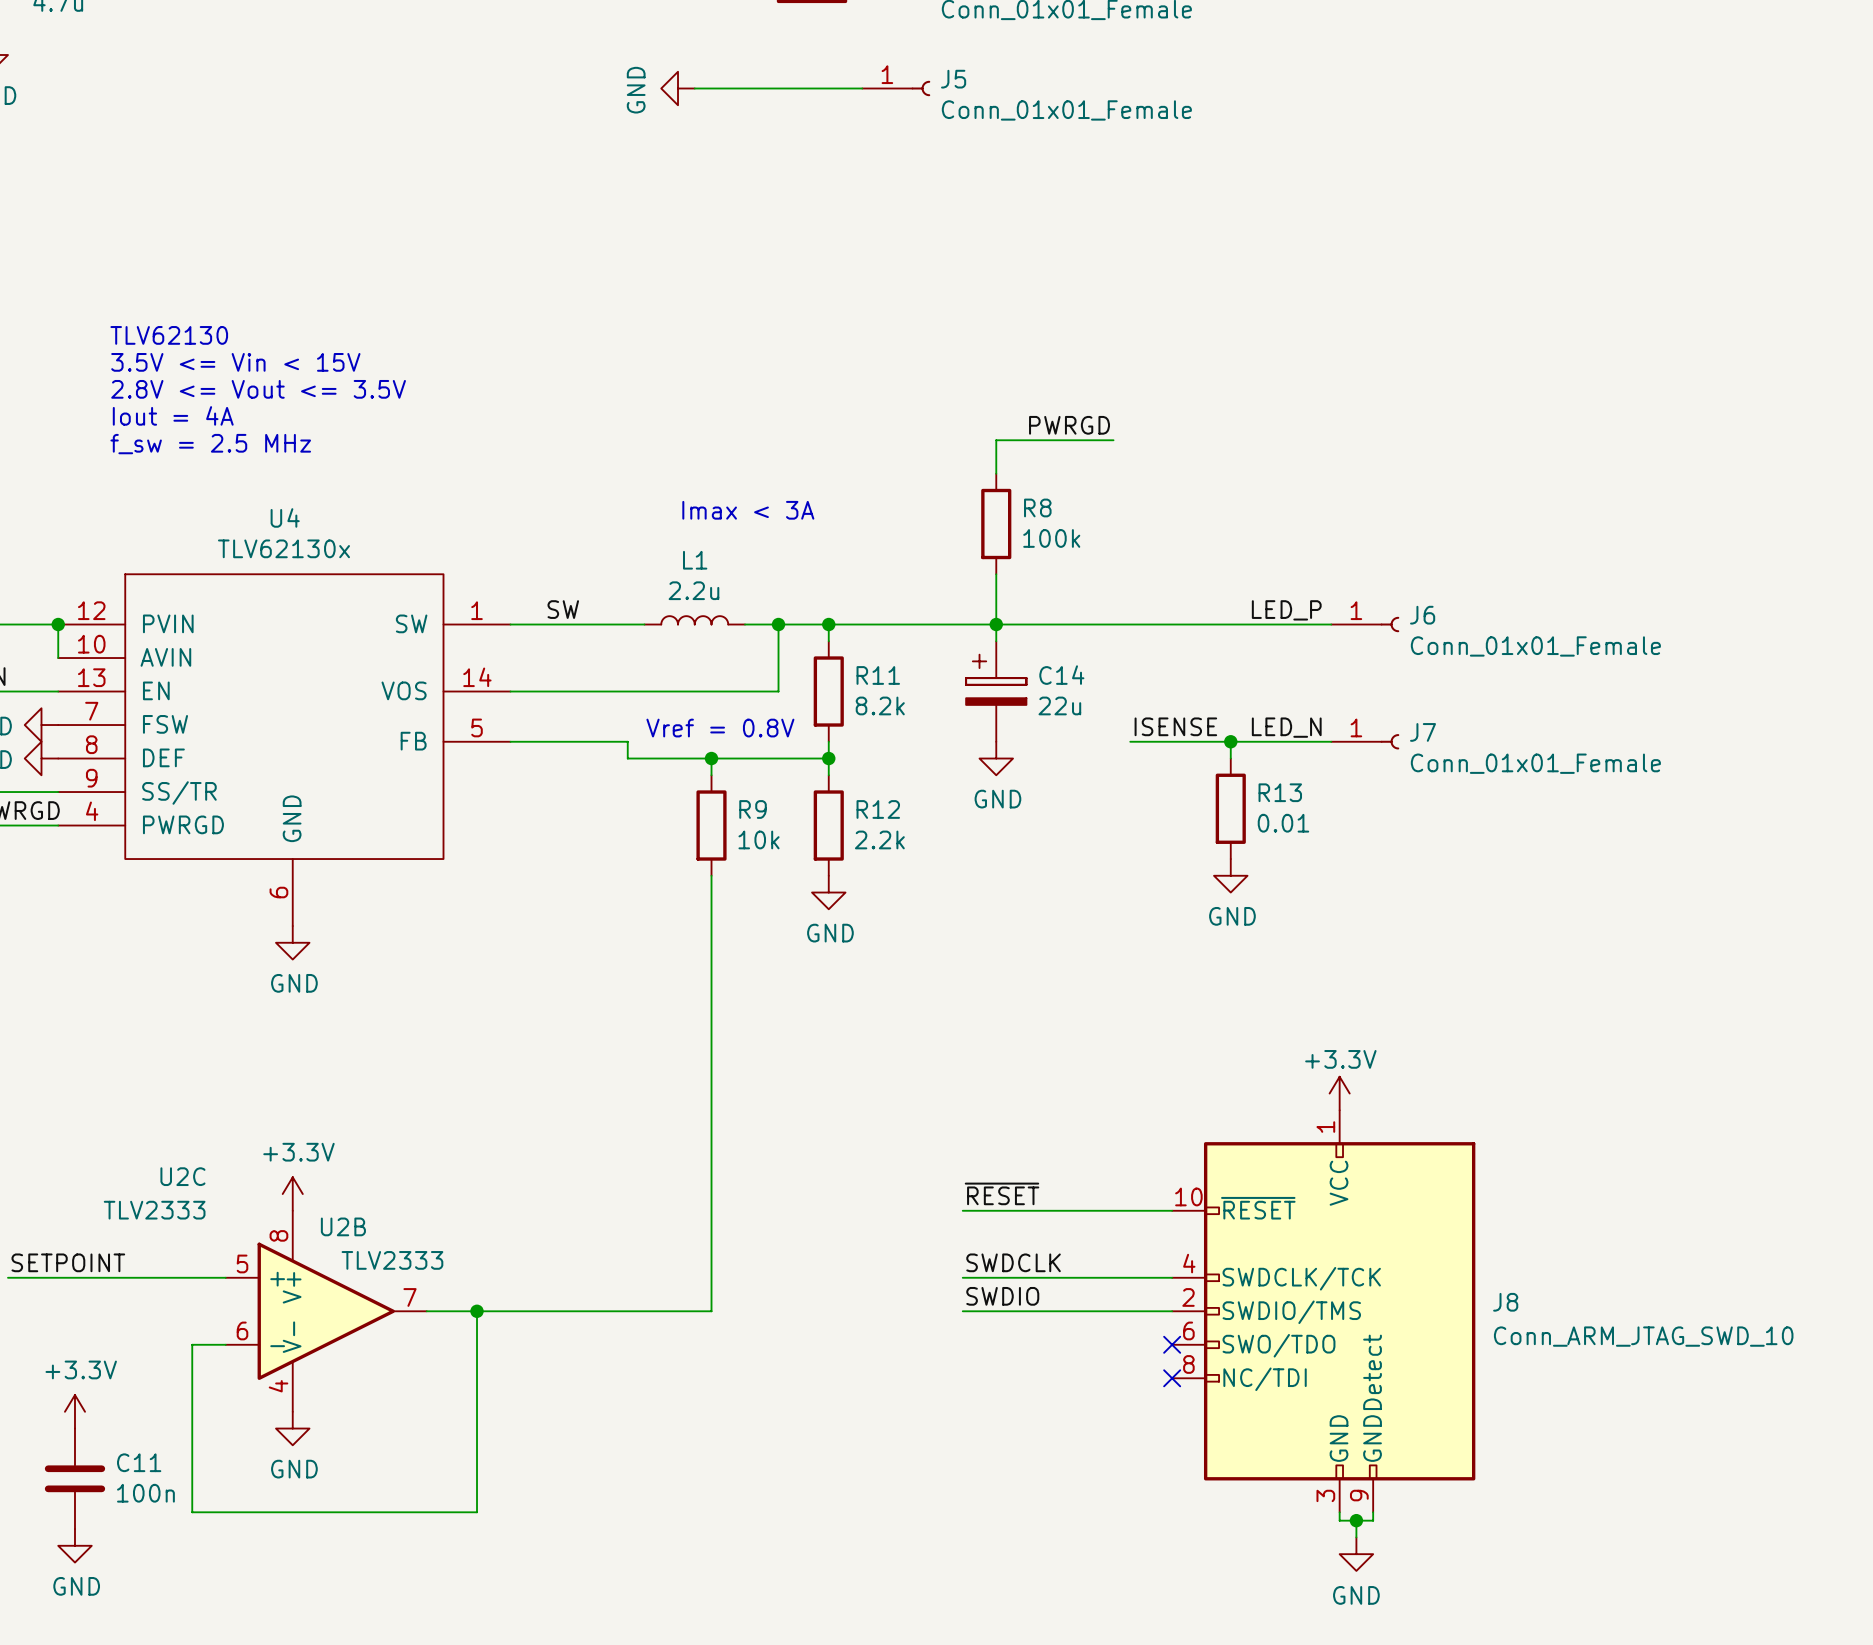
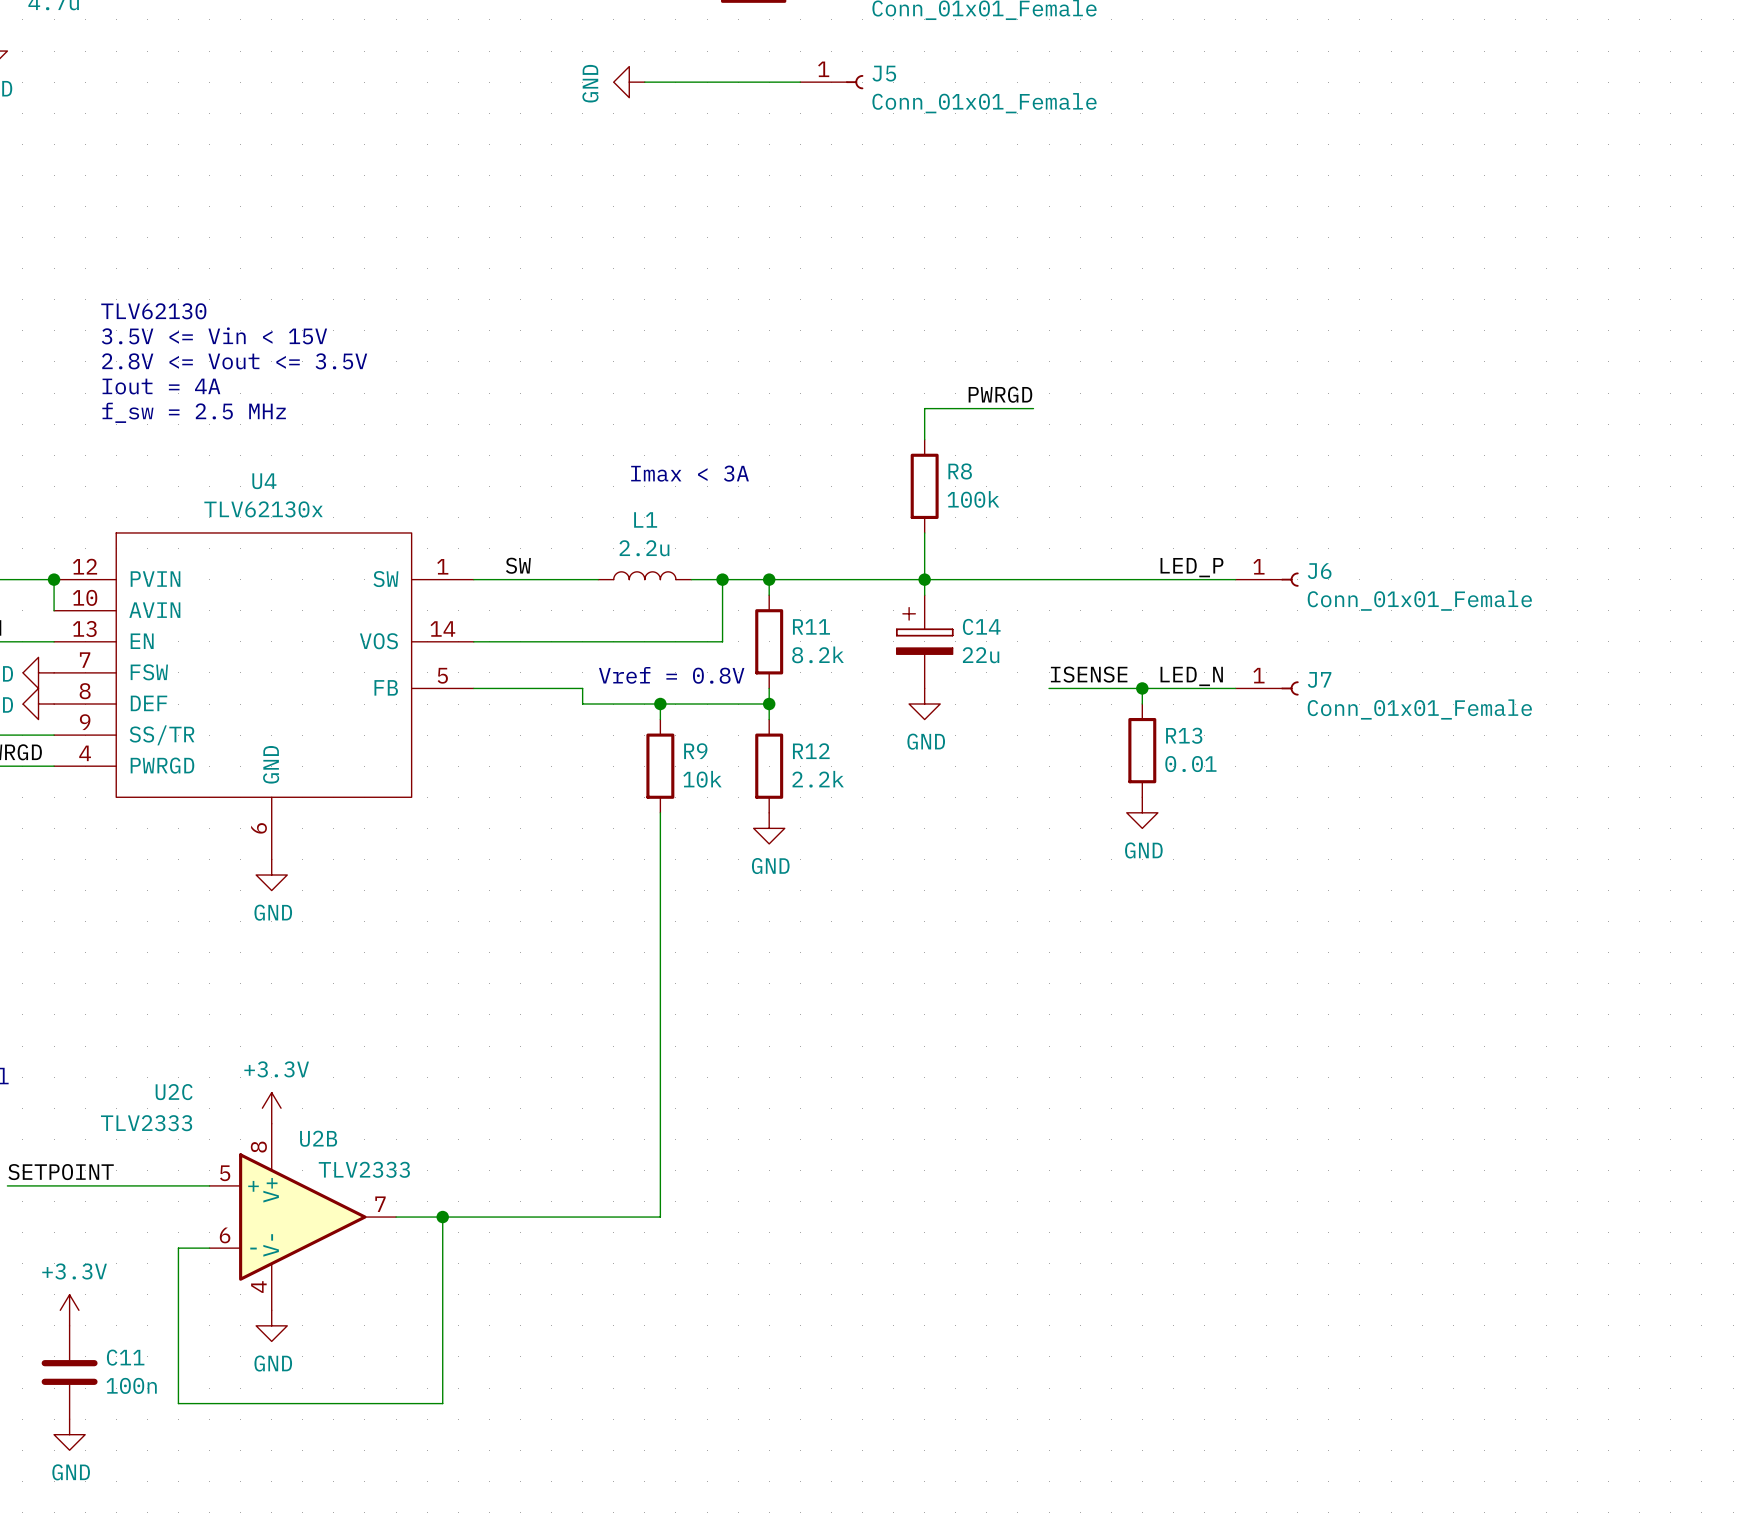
power symbol: +3.3V (1339, 1093) -> none
label: ~{RESET} (1002, 1193) -> none
wire: (962, 1210) (1172, 1210) -> none
label: SWDCLK (1013, 1262) -> none
wire: (962, 1277) (1172, 1277) -> none
label: SWDIO (1002, 1296) -> none
wire: (962, 1311) (1172, 1311) -> none
J8: Conn_ARM_JTAG_SWD_10 (1323, 1311) -> none
no-connect mark: (1172, 1344) -> none
no-connect mark: (1172, 1378) -> none
wire: (1339, 1512) (1339, 1520) (1373, 1520) (1373, 1512) -> none
wire: (1356, 1520) (1356, 1537) -> none
junction: (1356, 1520) -> none
power symbol: GND (1356, 1554) -> none

